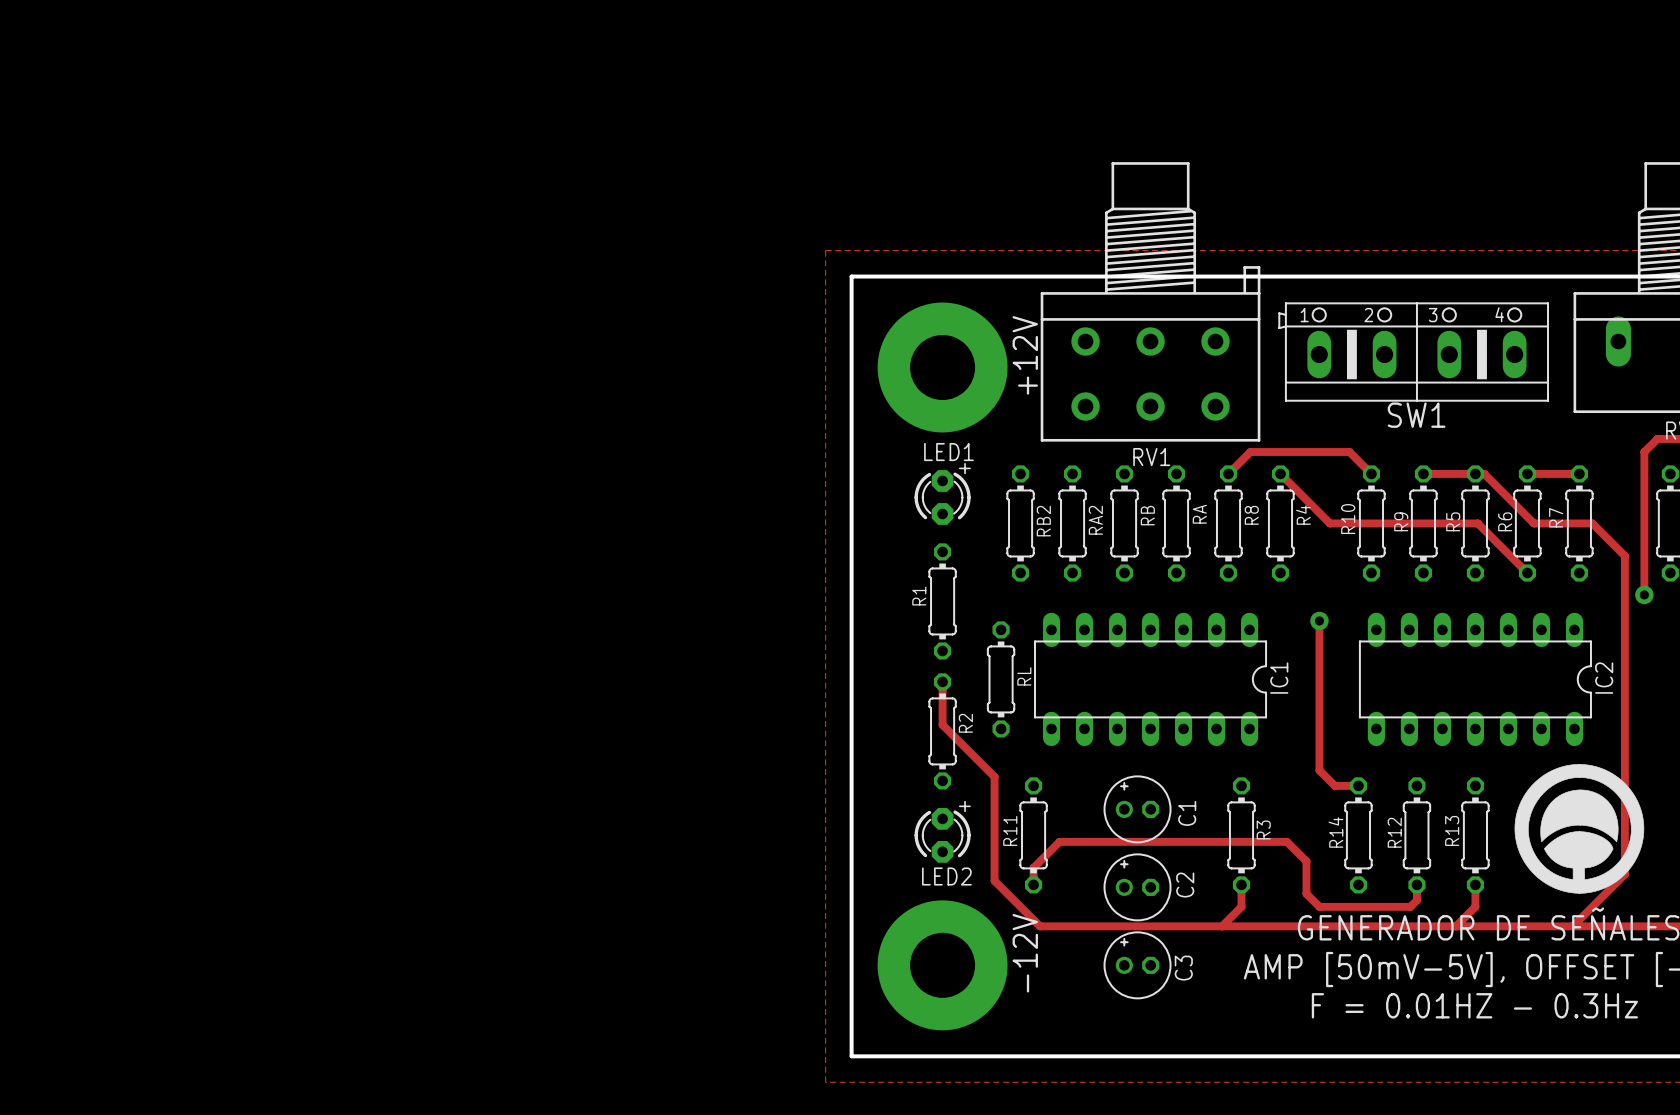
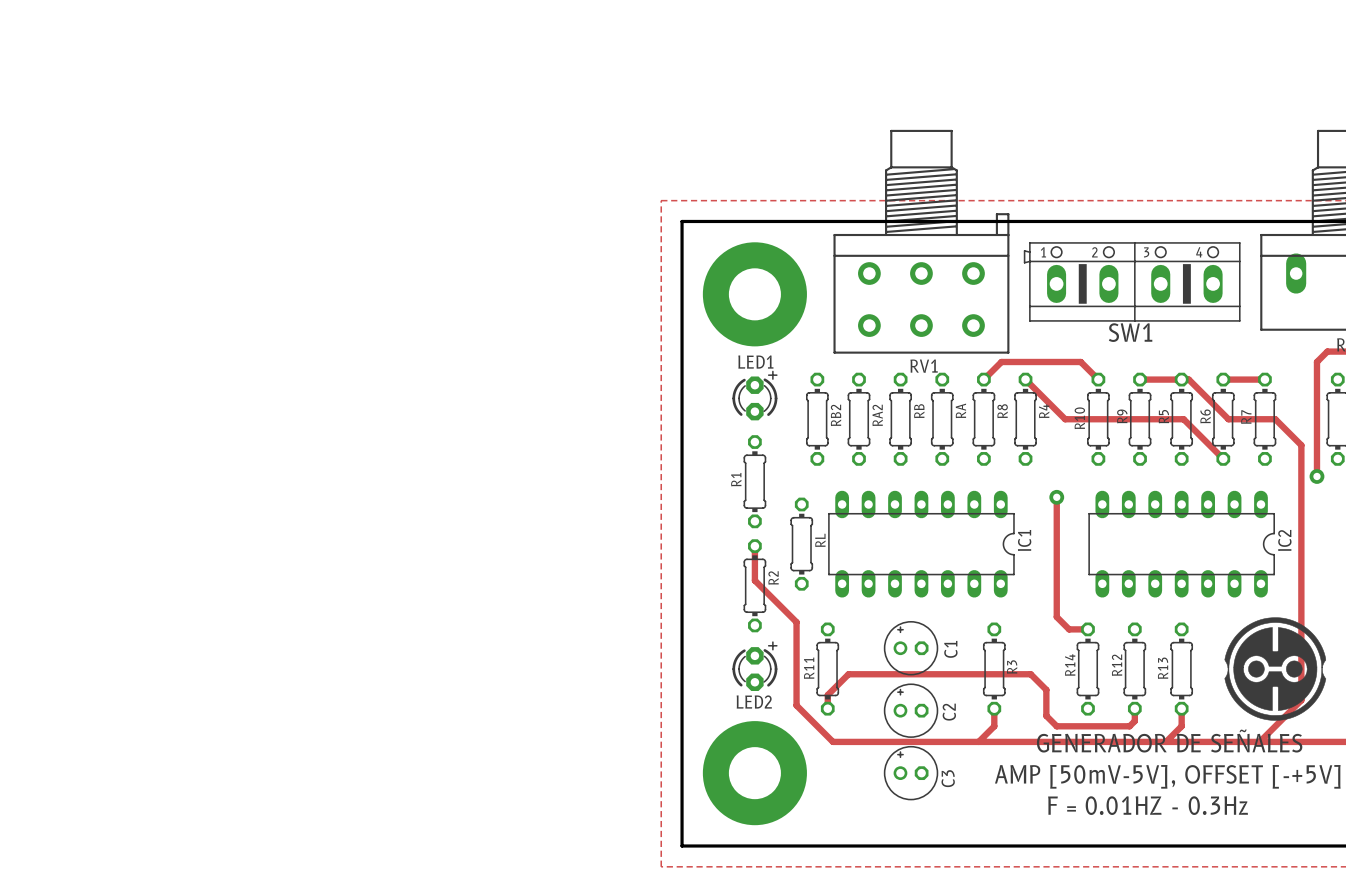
text: +12V (1025, 355) -> none
drawing: [1514, 764, 1645, 894] -> none
drawing: none -> [1224, 617, 1327, 721]
text: -12V (1025, 953) -> none

